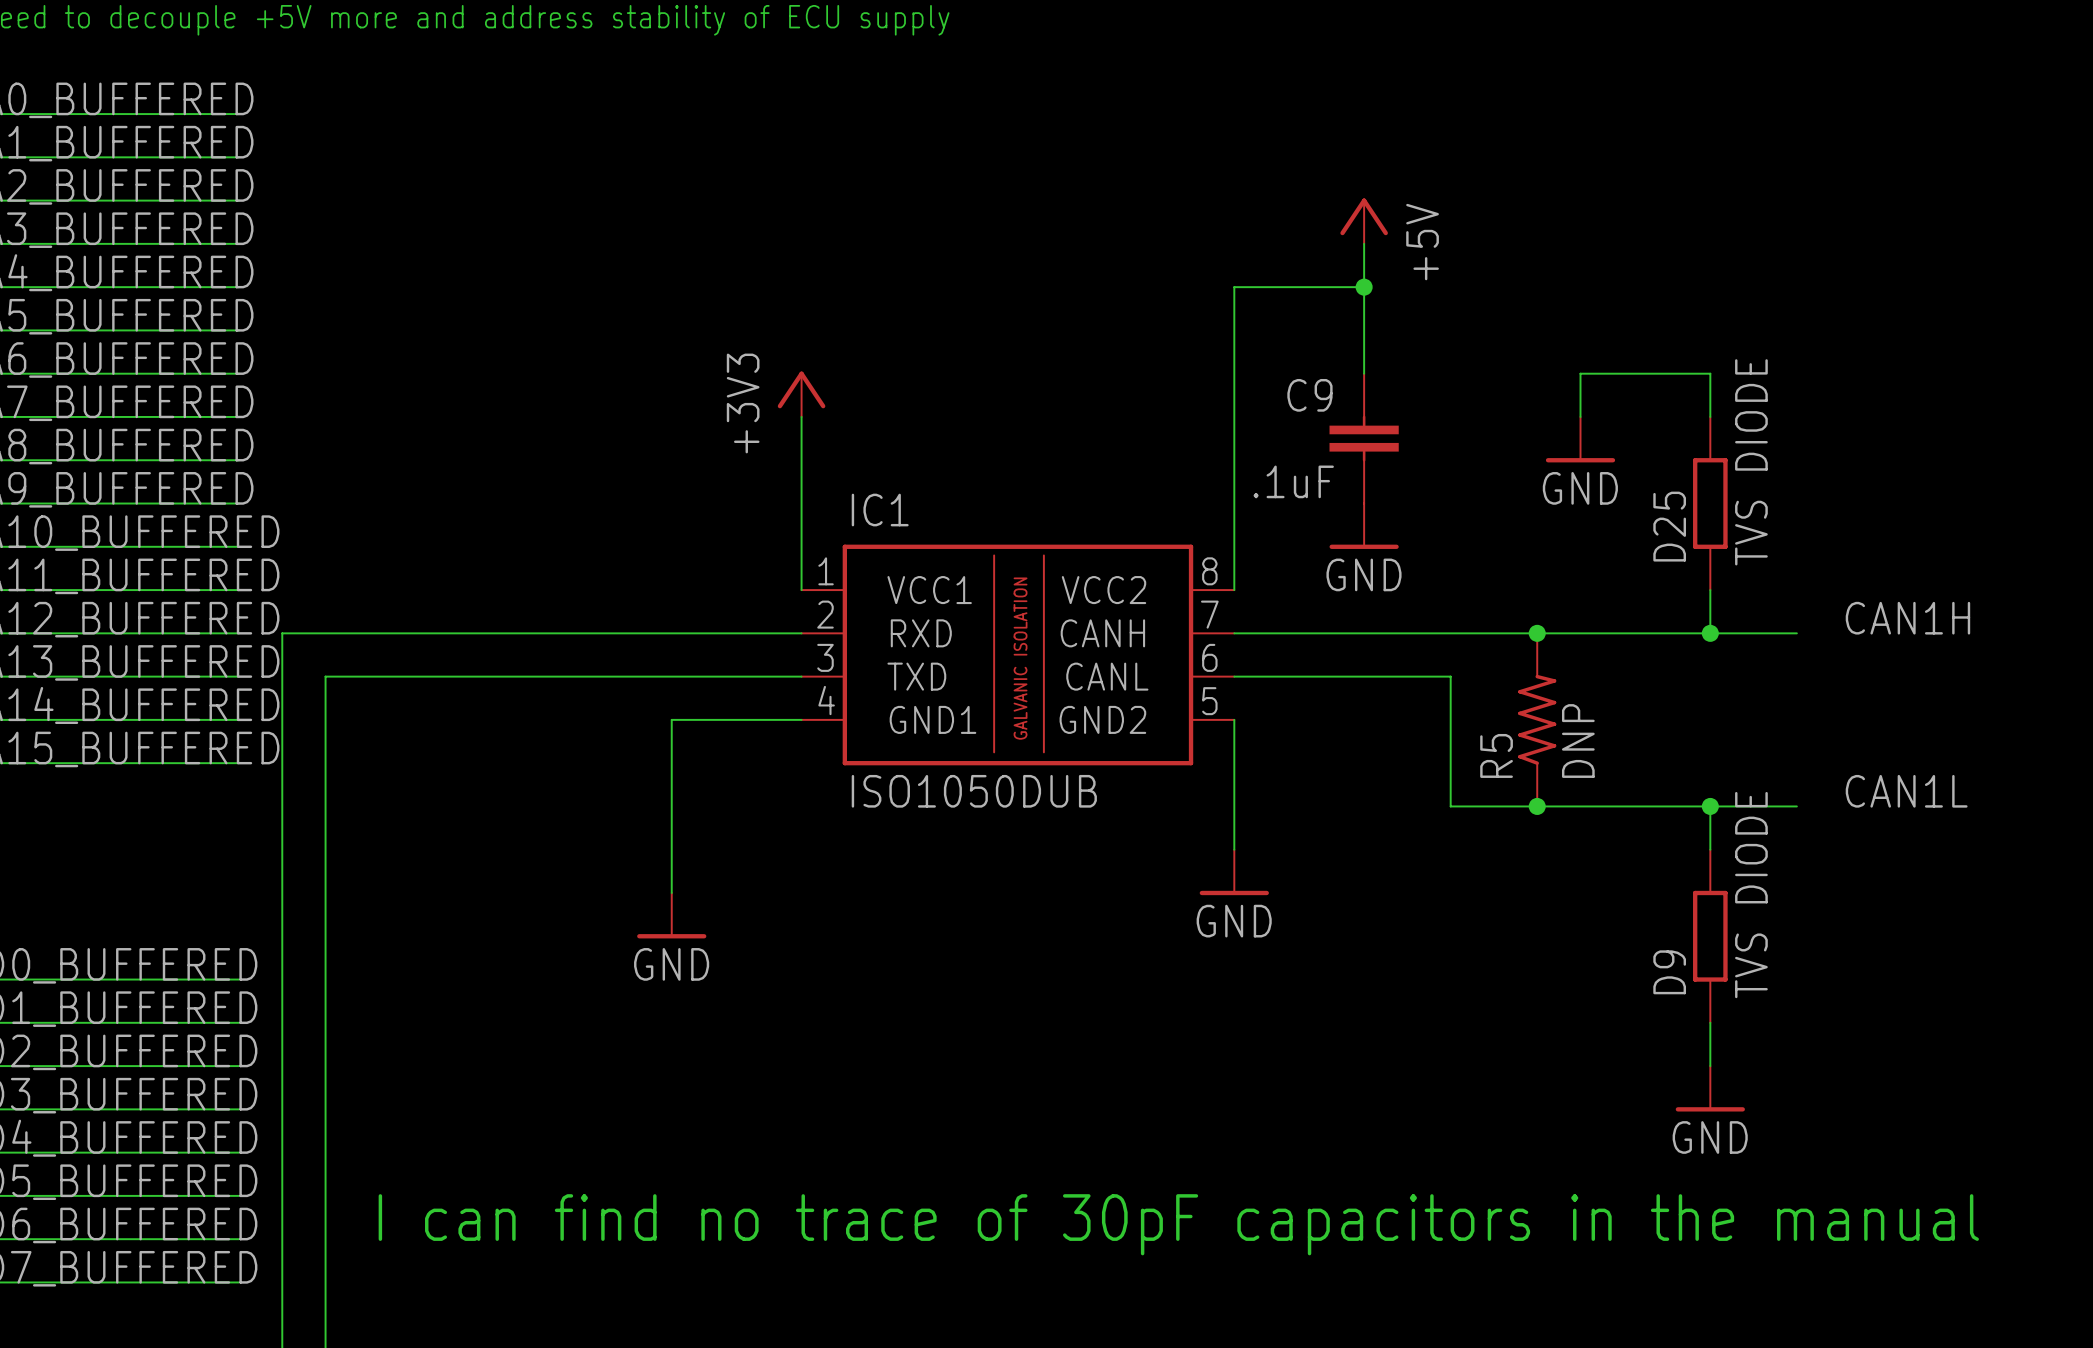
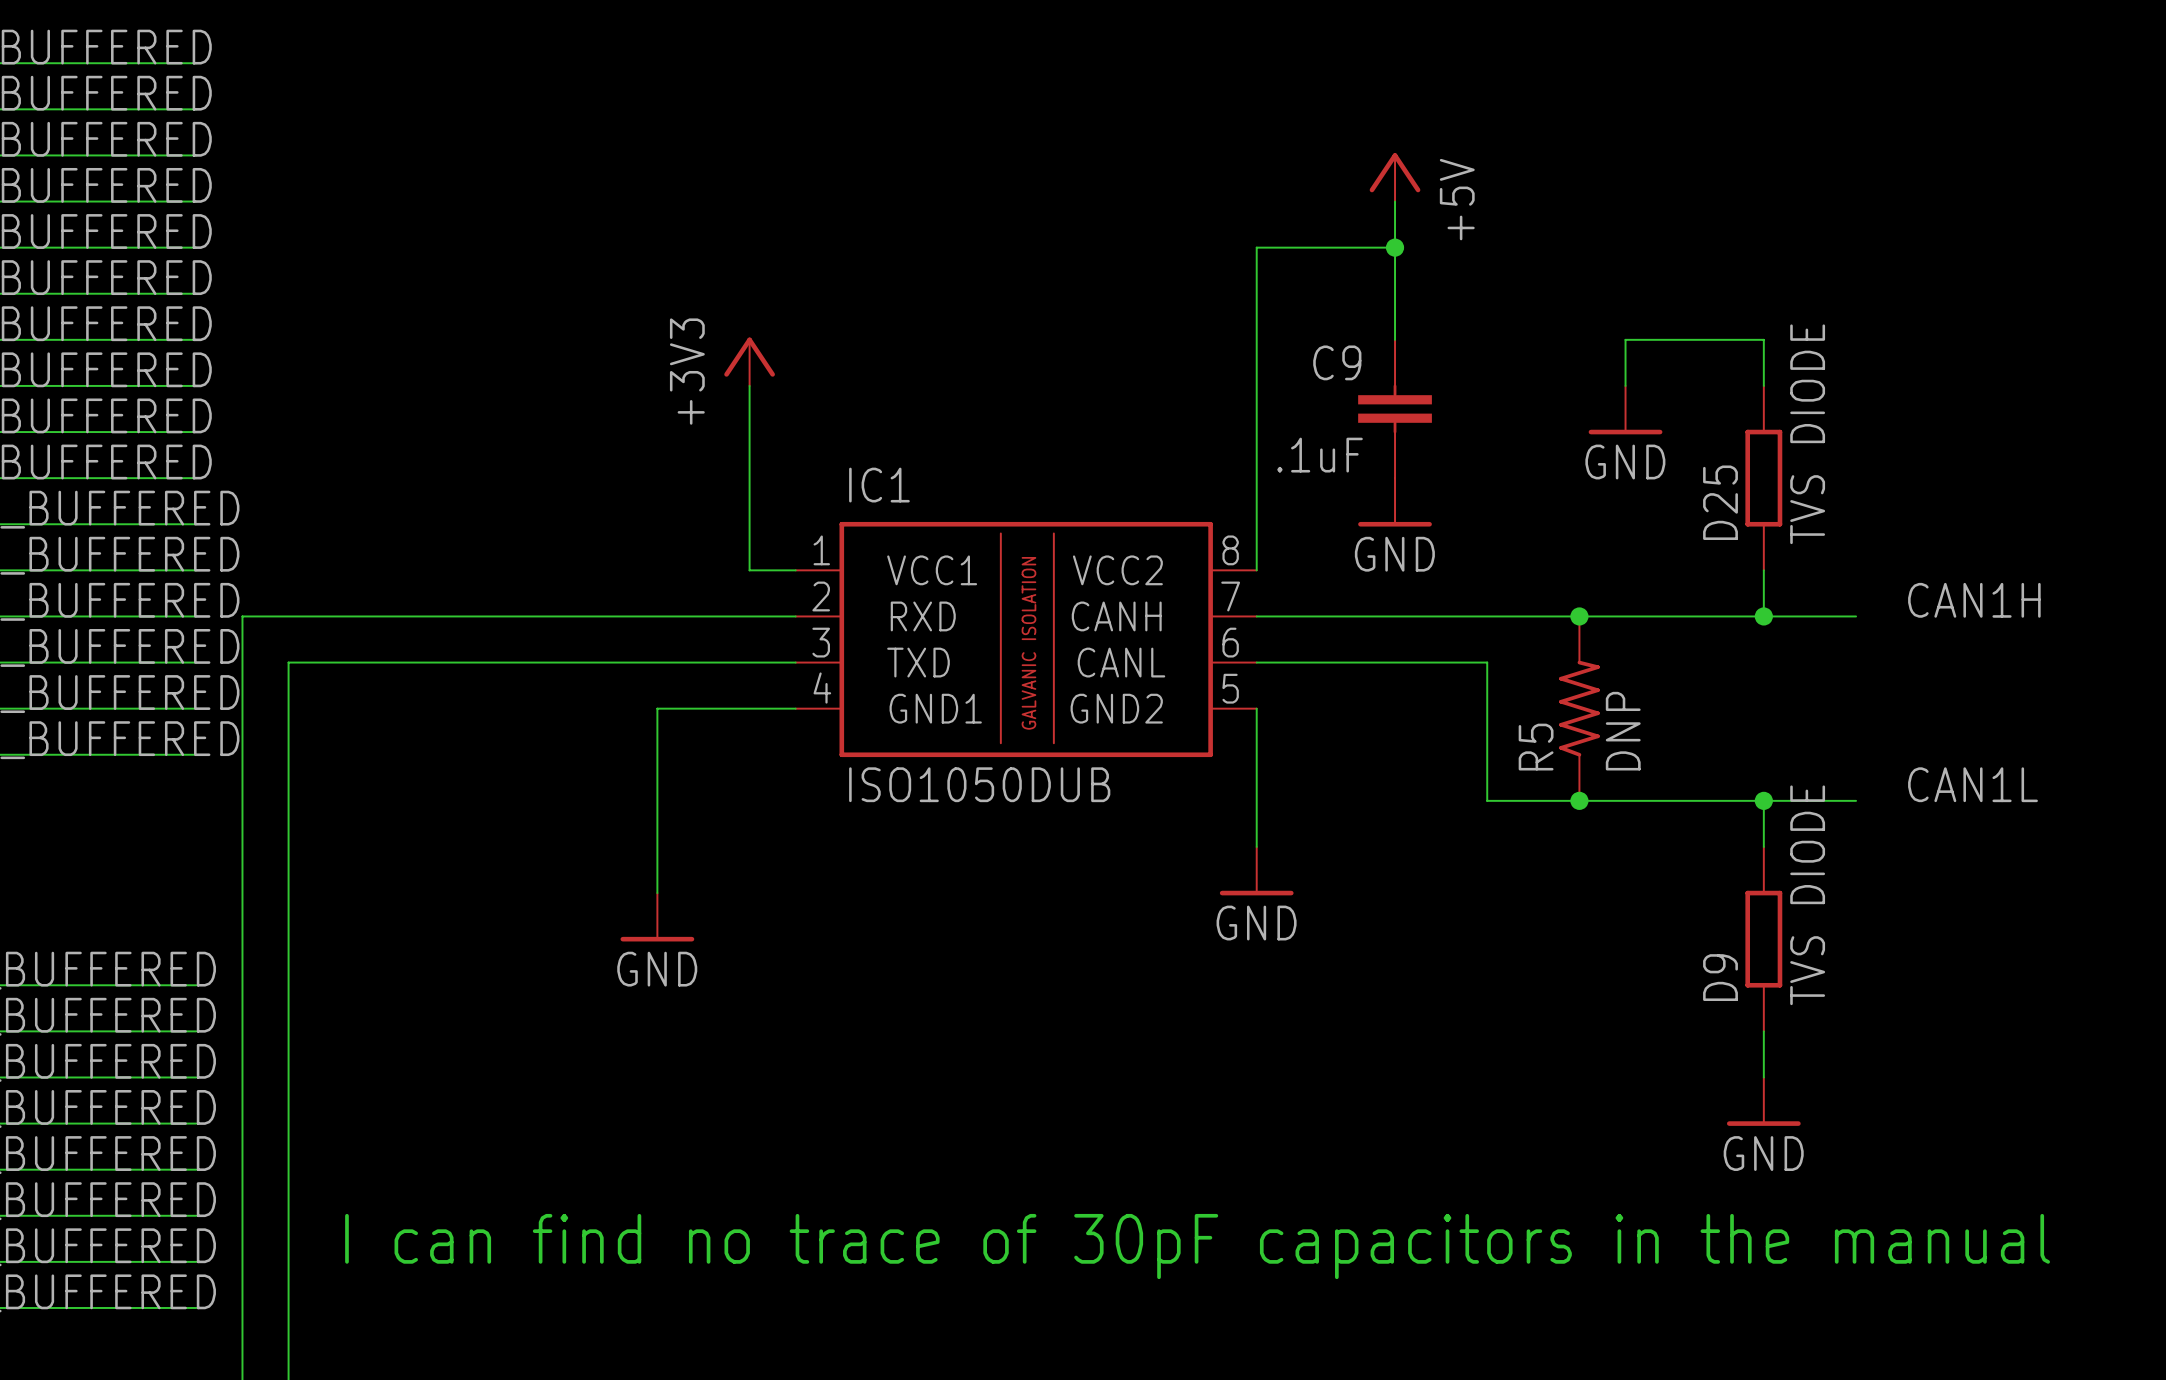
power symbol position: +3V3 (801, 394) -> +3V3 (749, 361)
wire: (801, 416) (801, 590) -> (749, 385) (749, 570) (795, 570)

